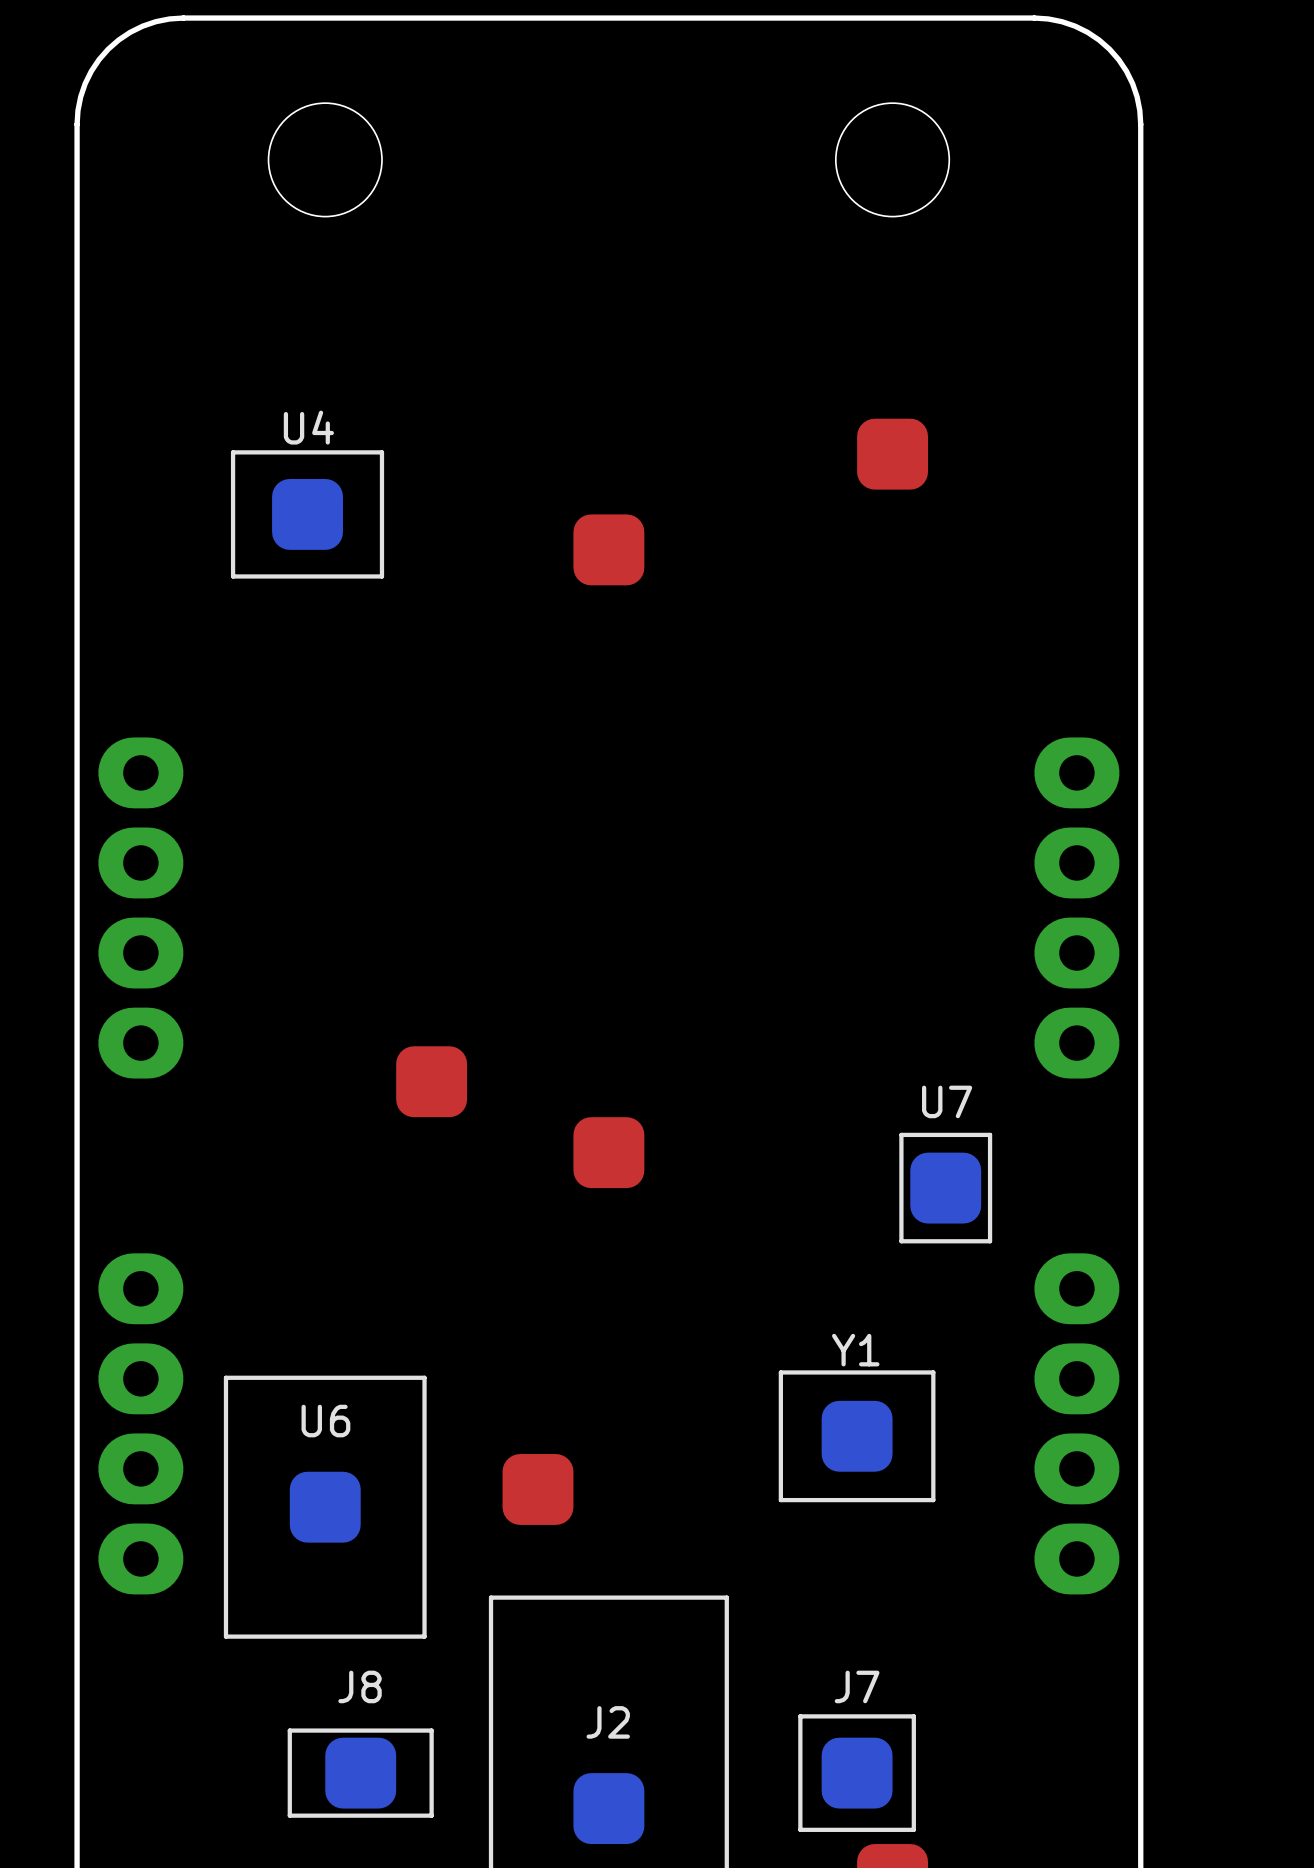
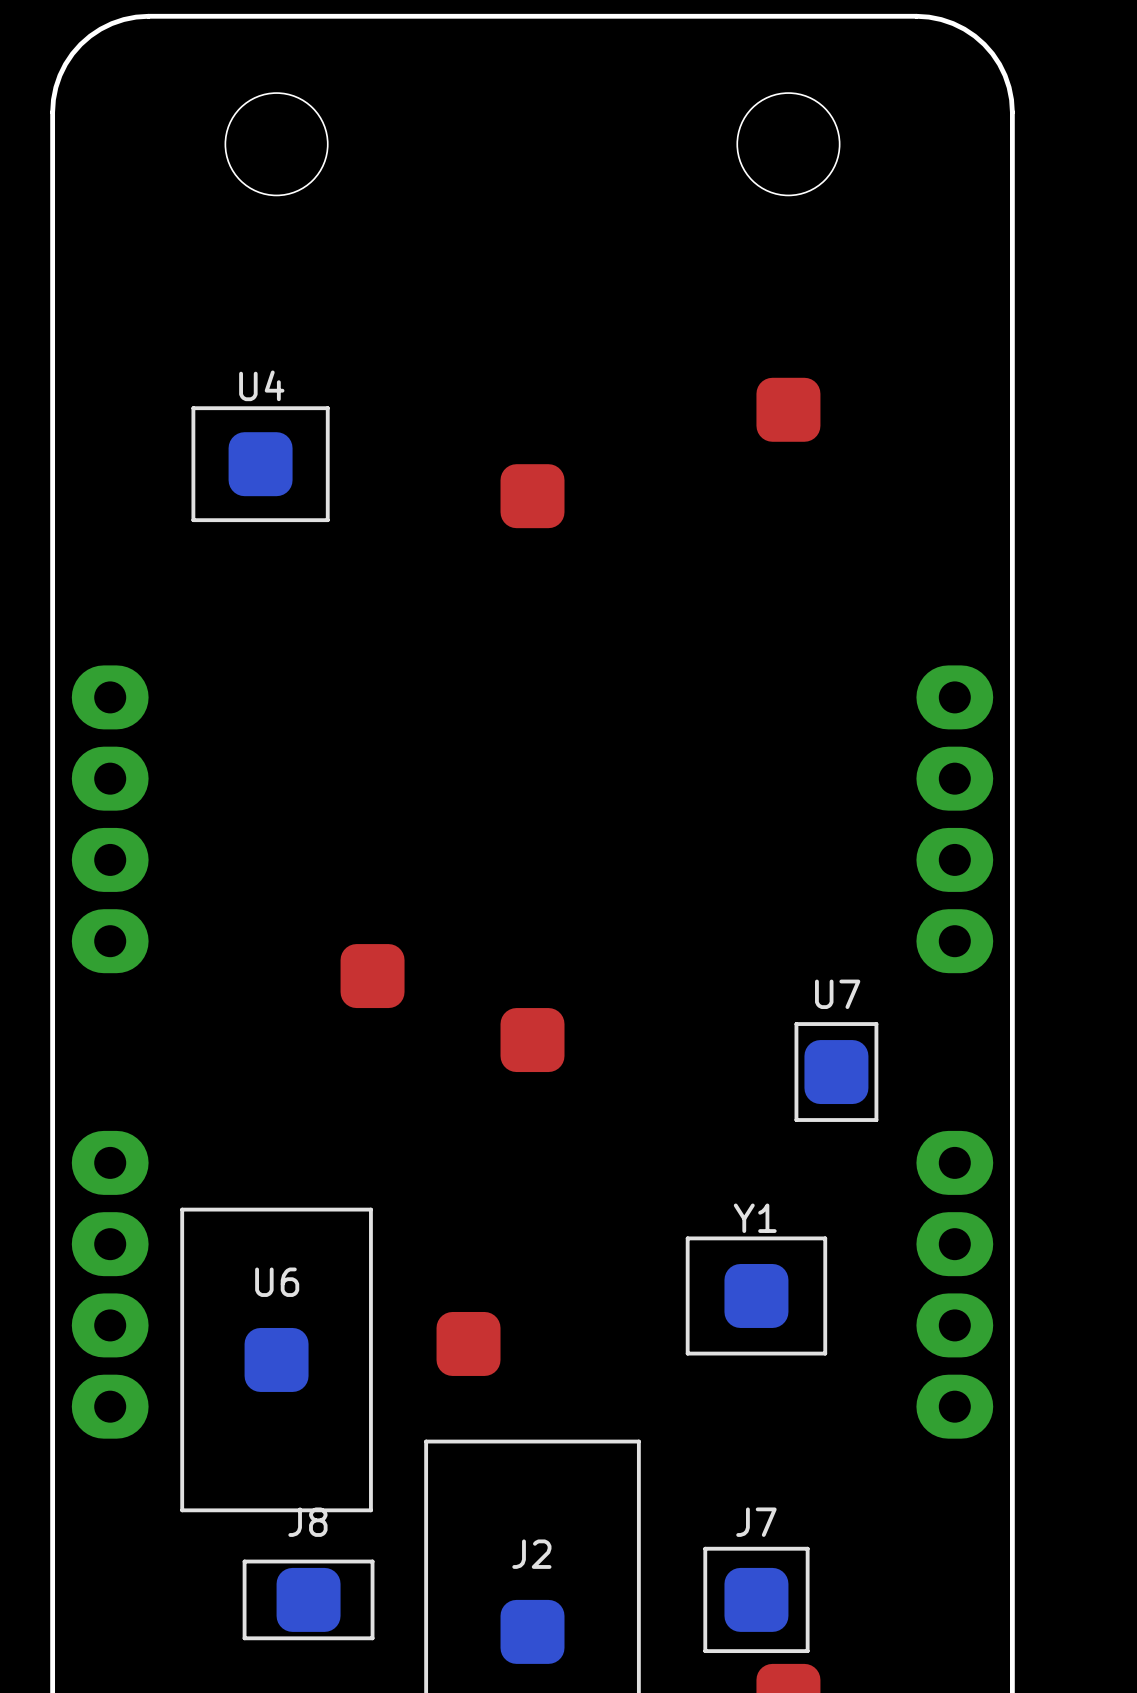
line: (424, 1377) (225, 1377) (225, 1636) (424, 1636) (424, 1377) -> (370, 1209) (370, 1510) (182, 1510) (182, 1209) (370, 1209)

